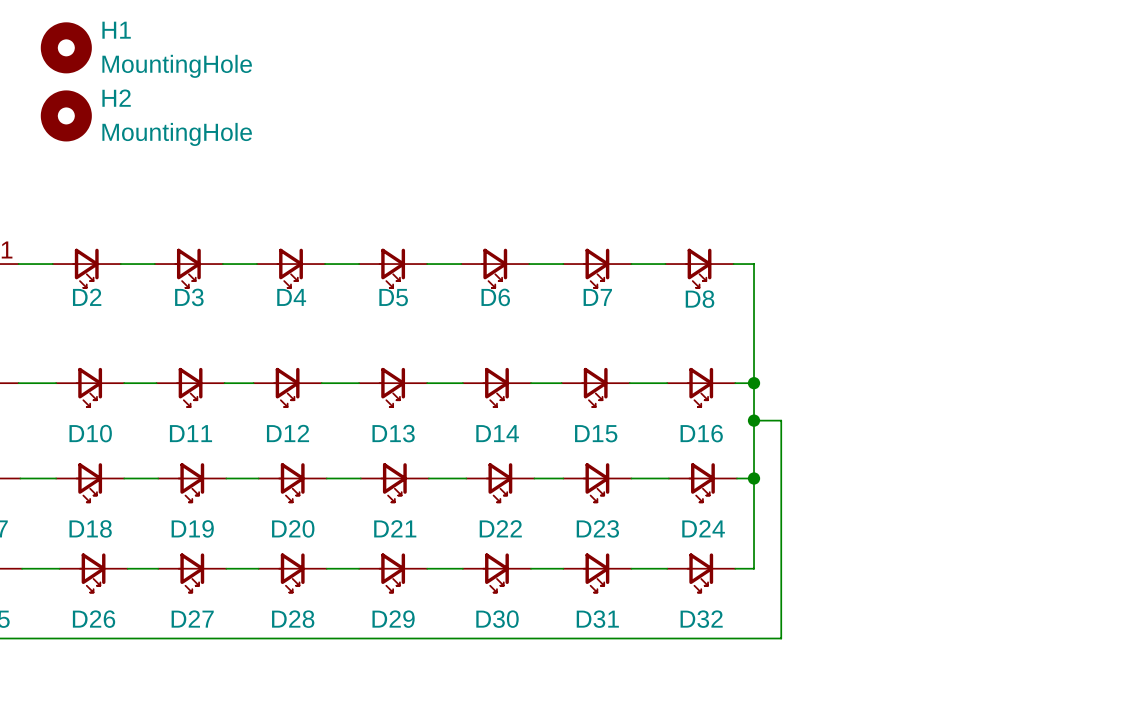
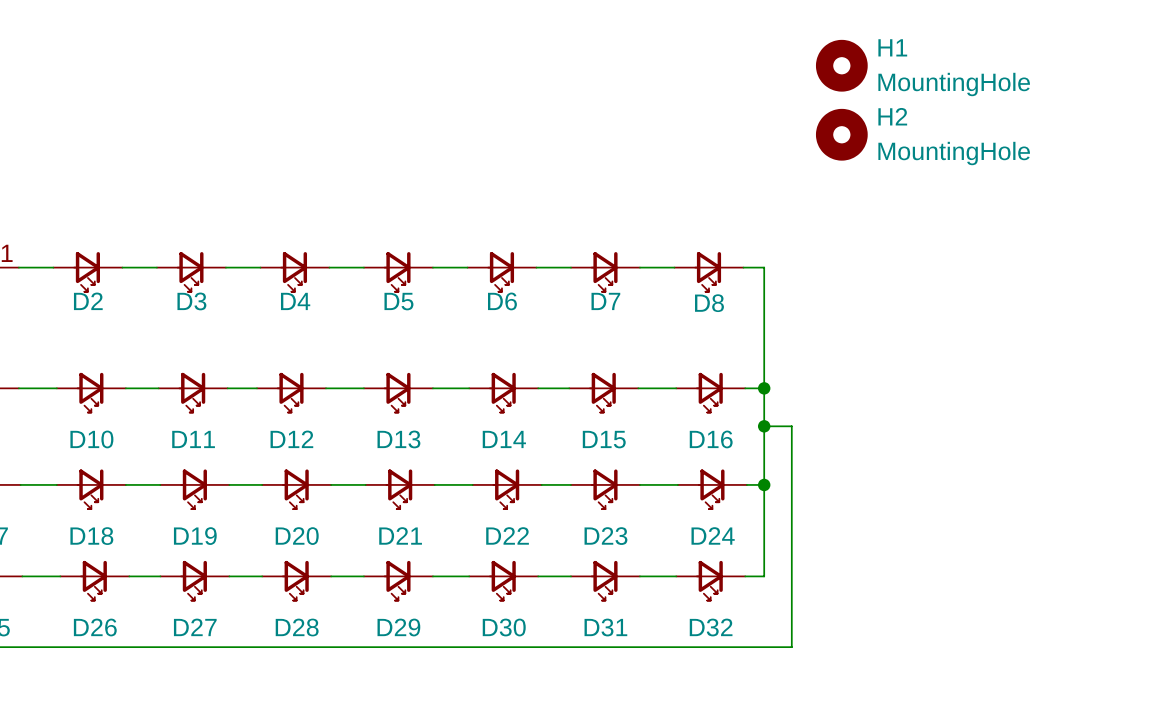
H1 position: (66, 47) -> (841, 65)
H2 position: (66, 115) -> (841, 134)

